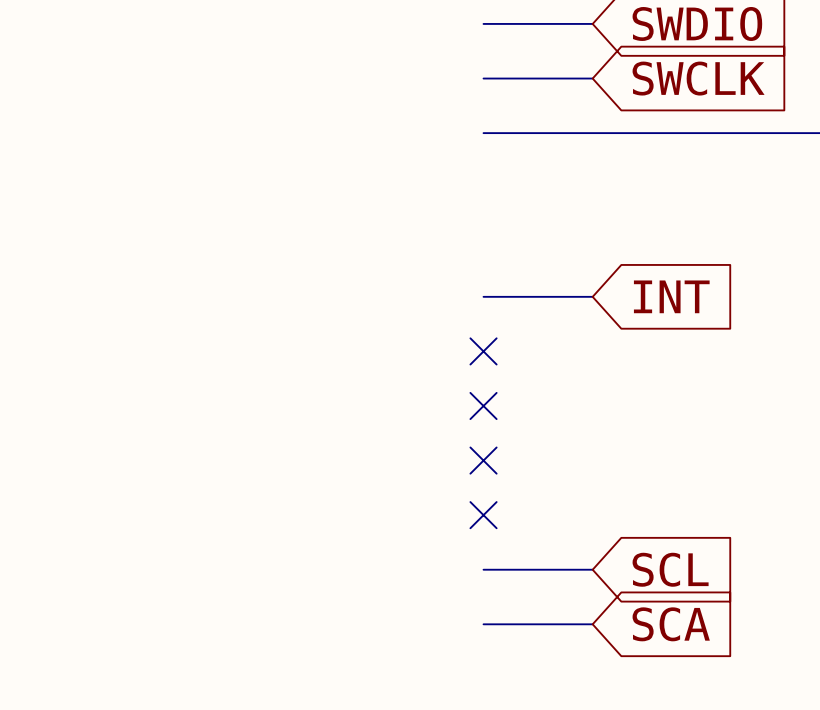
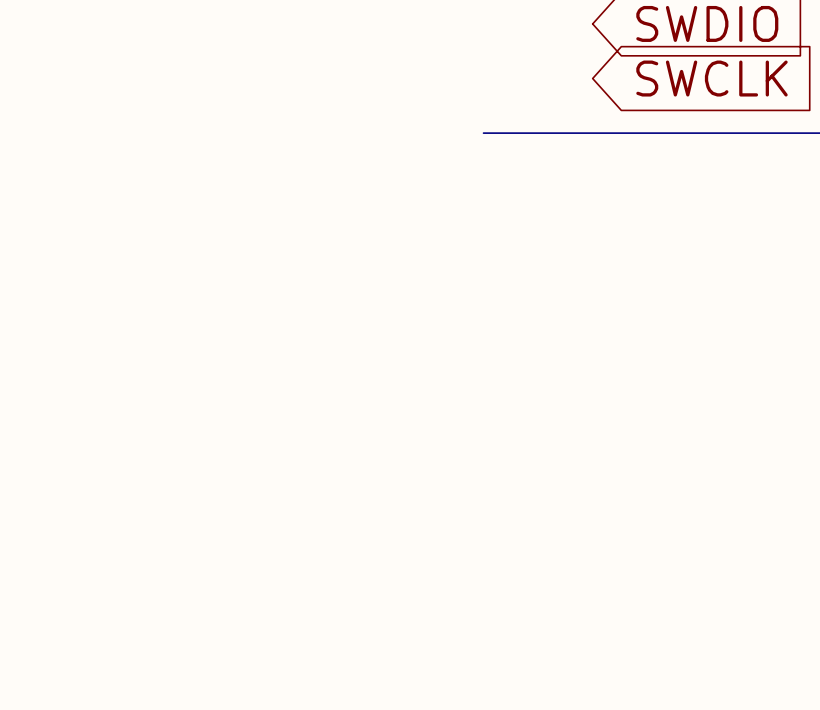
wire: (483, 23) (592, 23) -> none
wire: (483, 78) (592, 78) -> none
wire: (483, 296) (592, 296) -> none
global label: INT (671, 296) -> none
no-connect mark: (483, 351) -> none
no-connect mark: (483, 405) -> none
no-connect mark: (483, 460) -> none
no-connect mark: (483, 515) -> none
wire: (483, 569) (592, 569) -> none
global label: SCL (670, 569) -> none
wire: (483, 624) (592, 624) -> none
global label: SCA (671, 624) -> none

